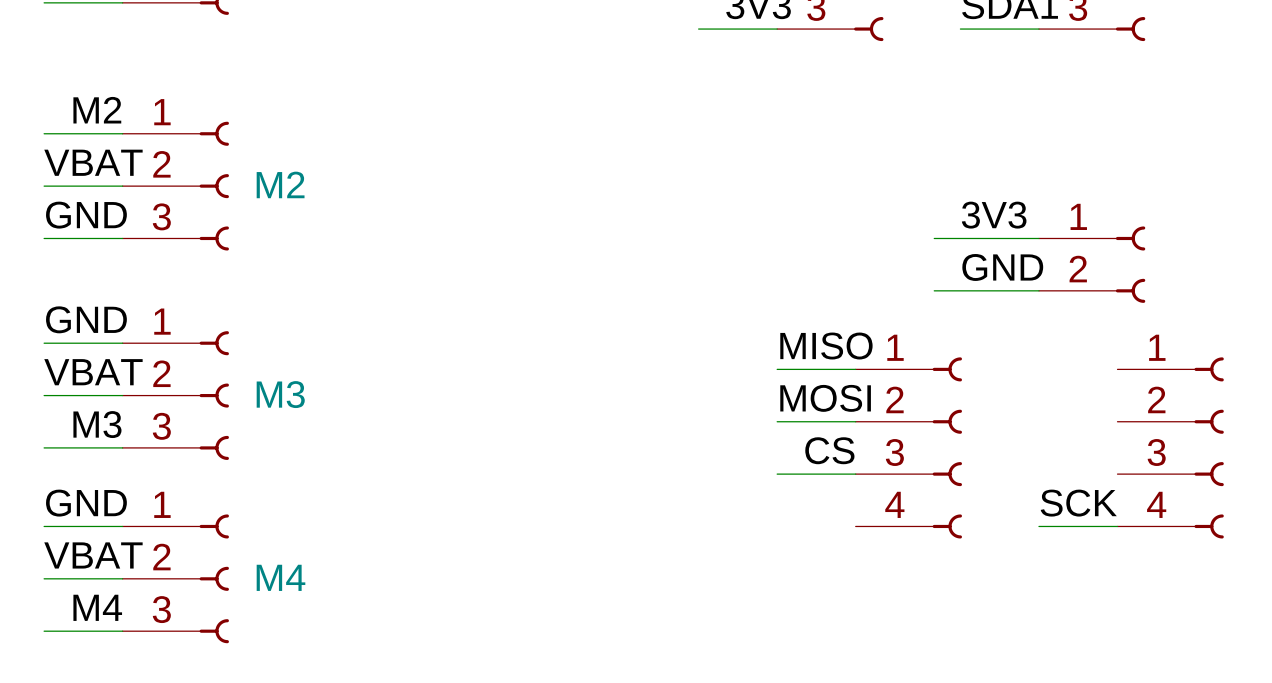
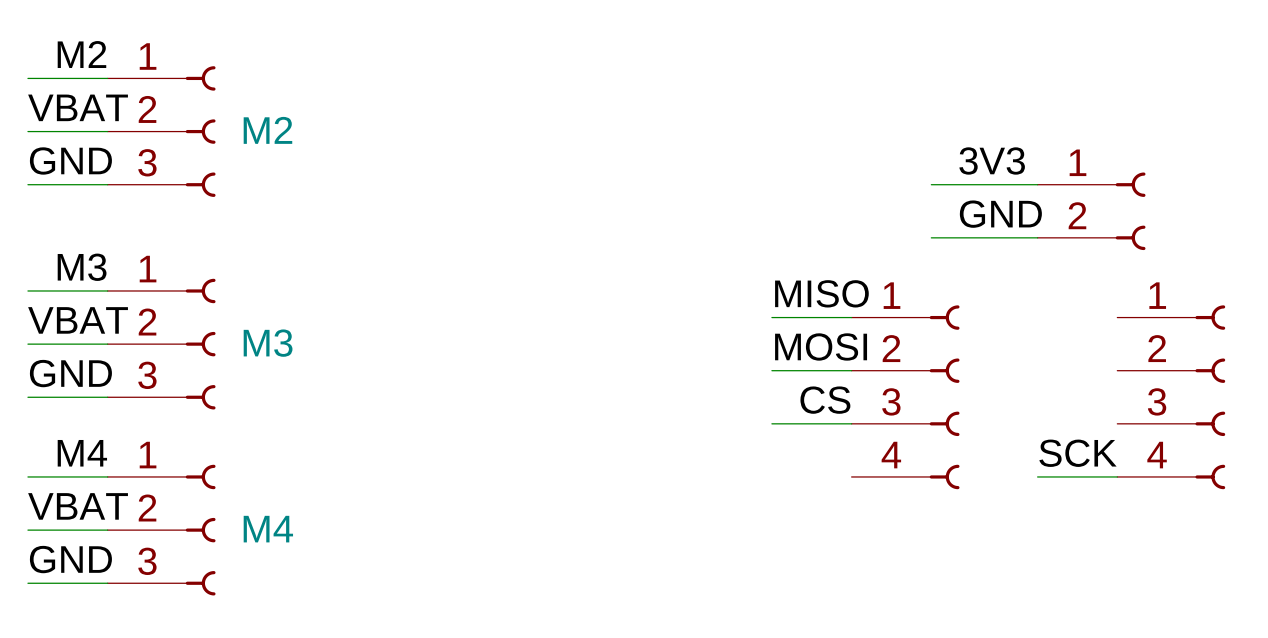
label: GND (86, 319) -> none
label: none -> GND (70, 373)
label position: M3 (97, 424) -> M3 (82, 267)
label: GND (86, 503) -> none
label: none -> GND (70, 559)
label position: M4 (97, 607) -> M4 (82, 453)

